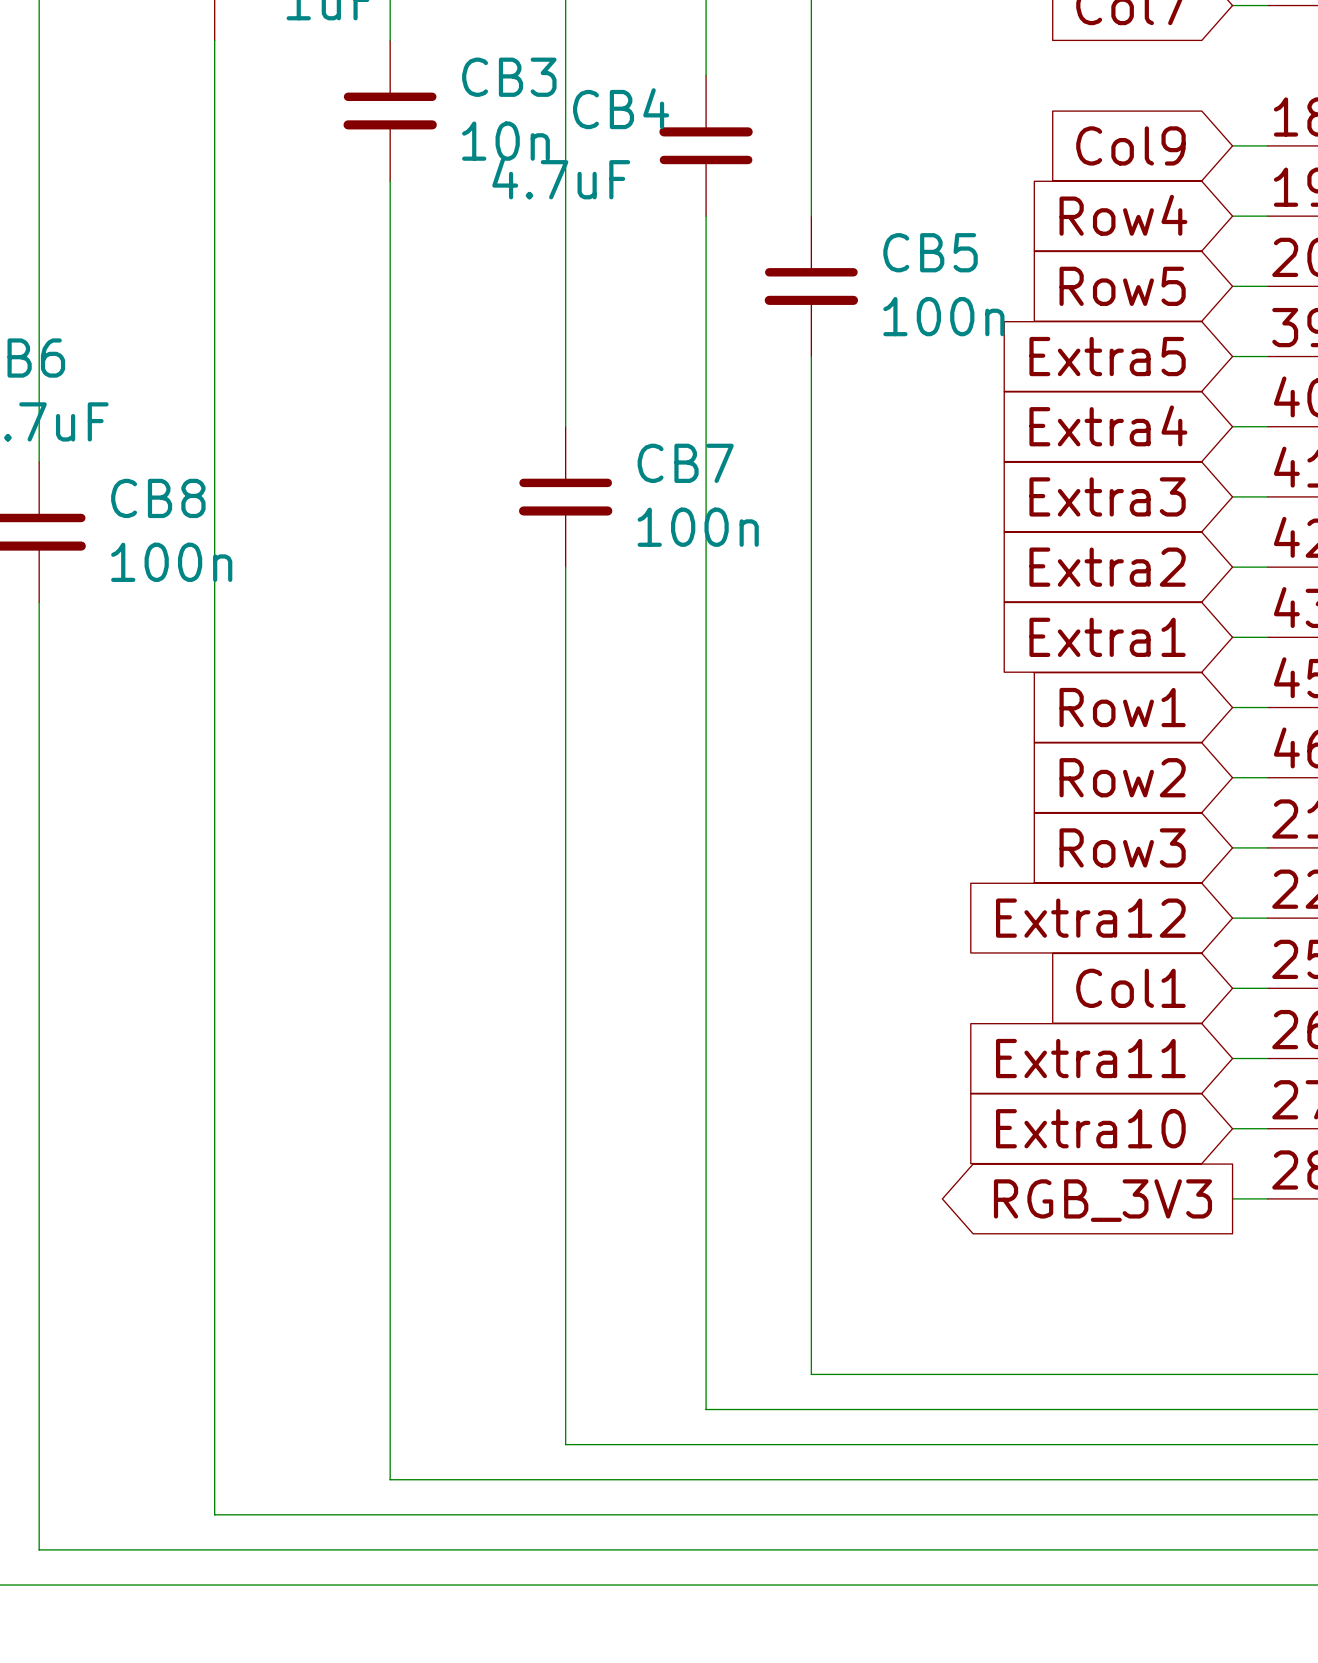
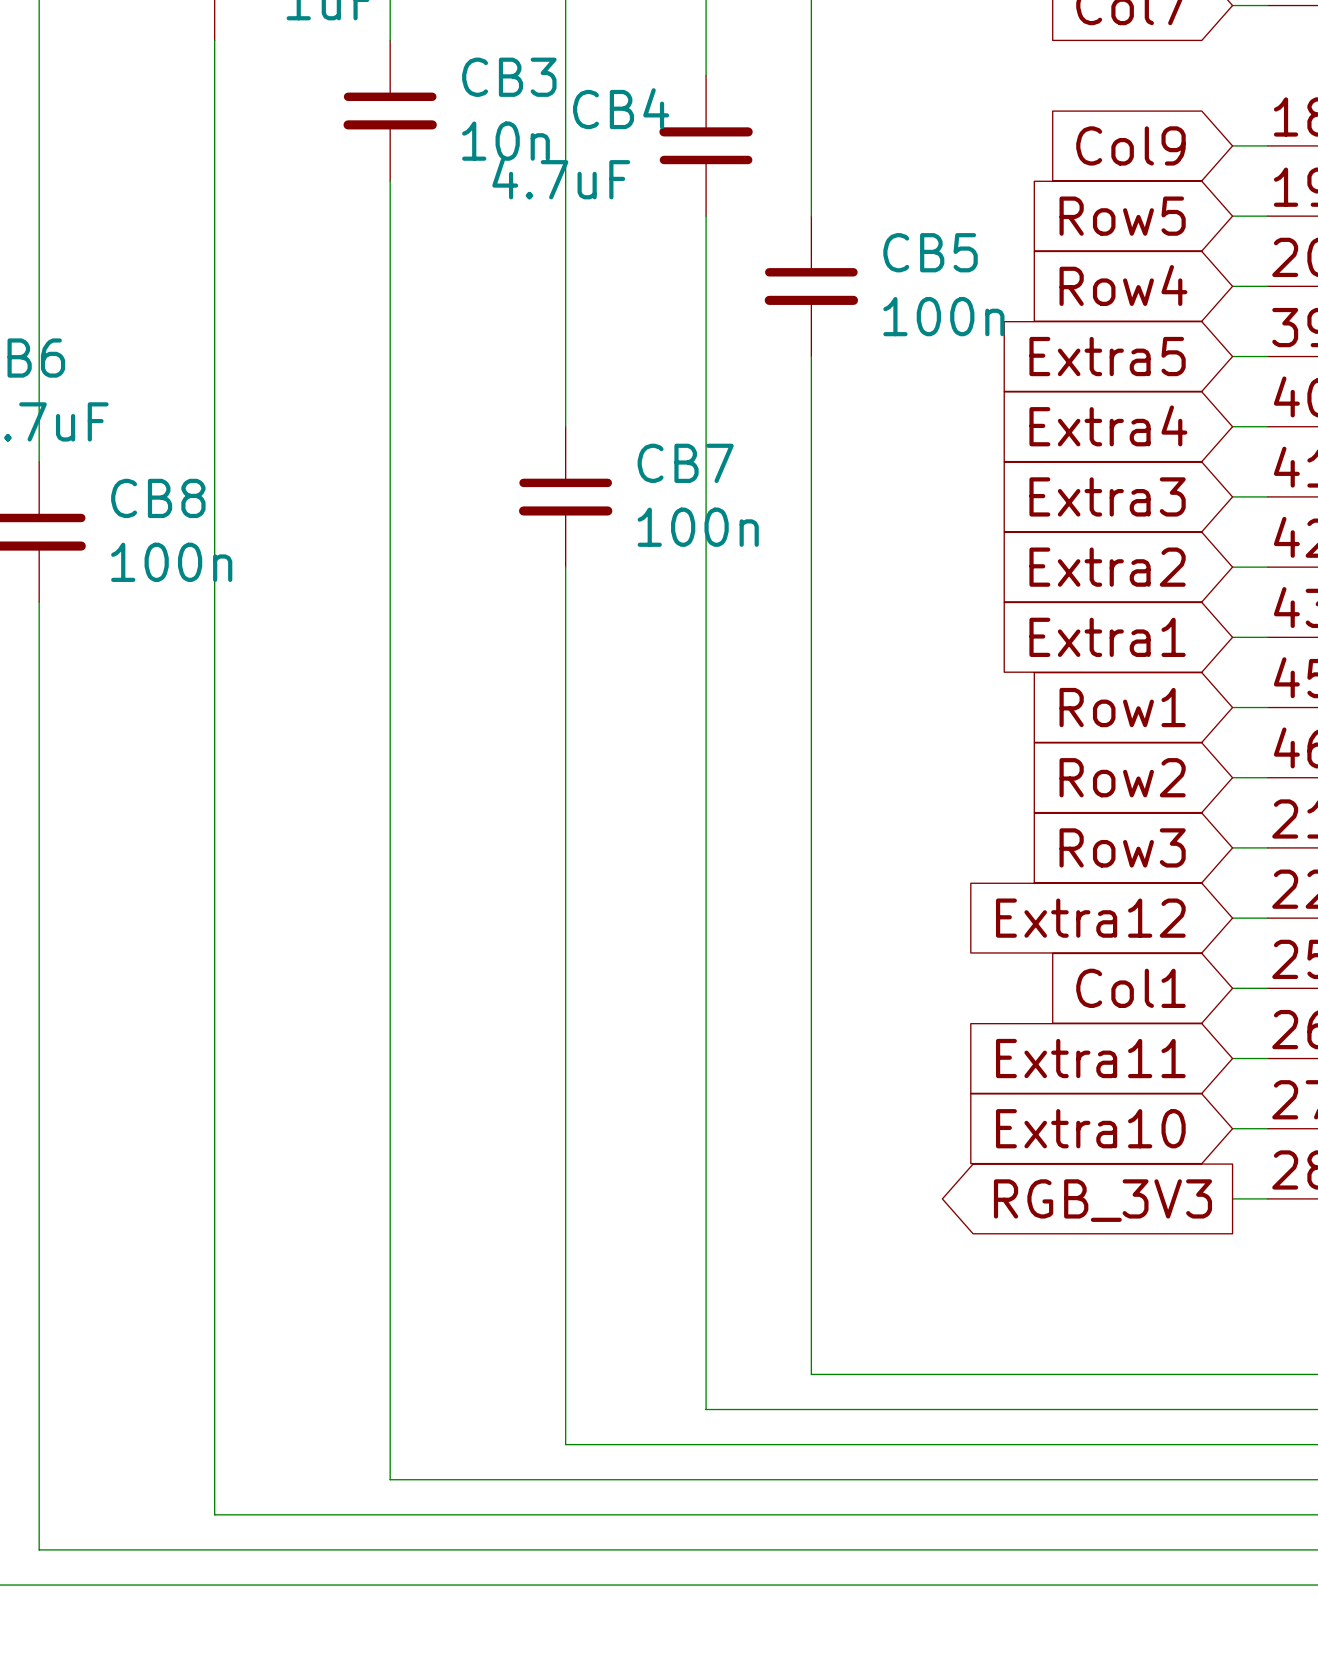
global label: Row4 (1123, 215) -> Row5 (1122, 216)
global label: Row5 (1122, 286) -> Row4 (1123, 285)

